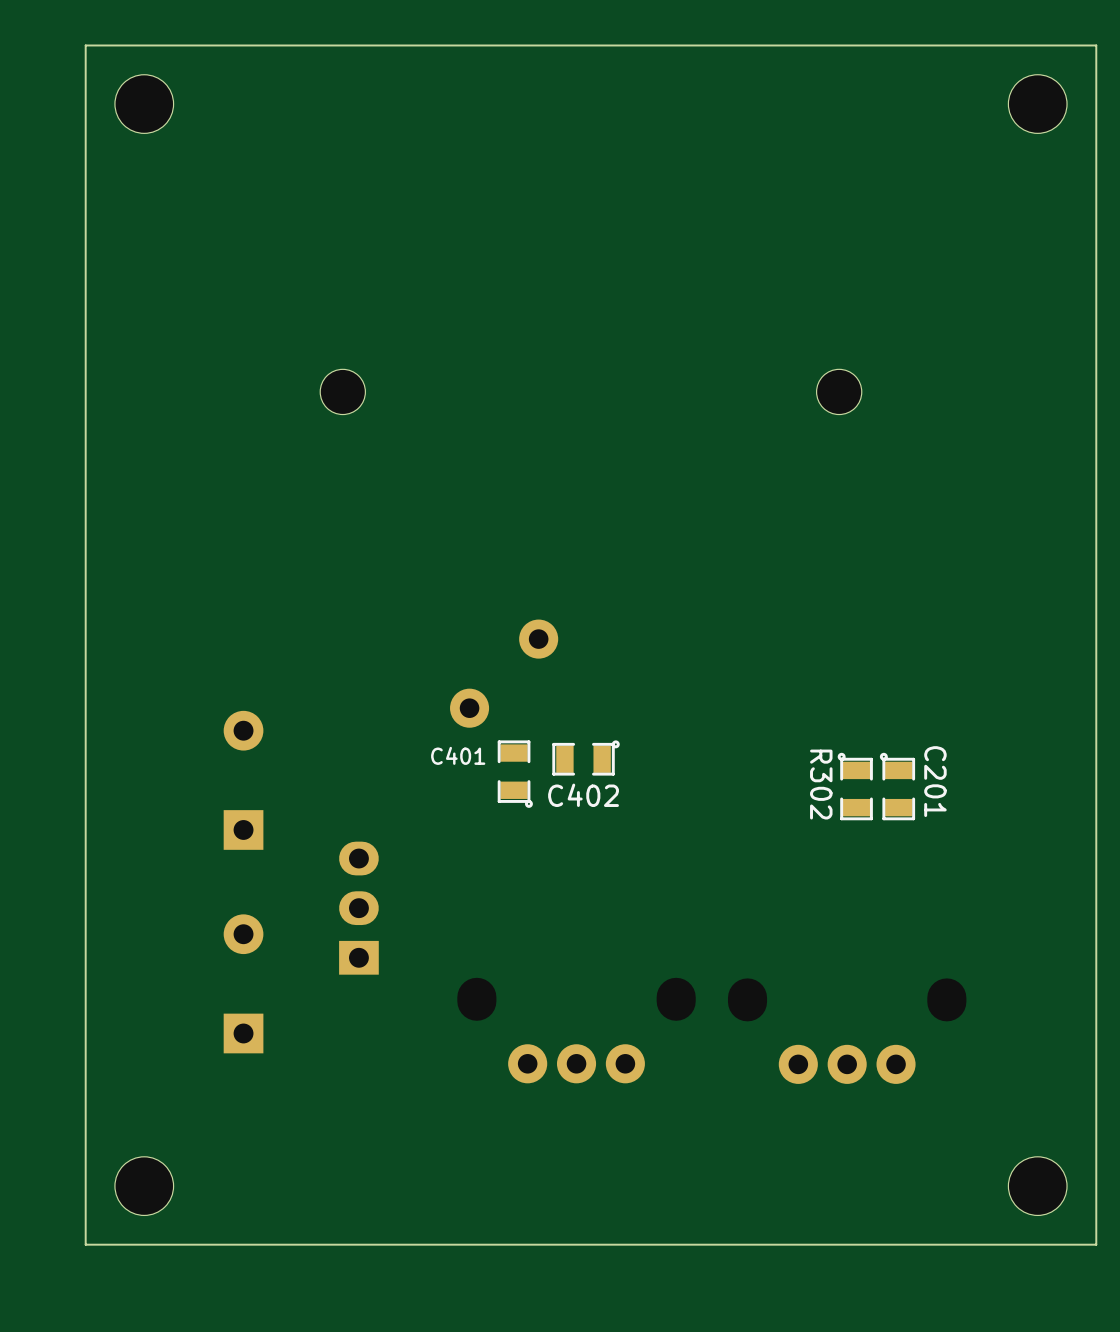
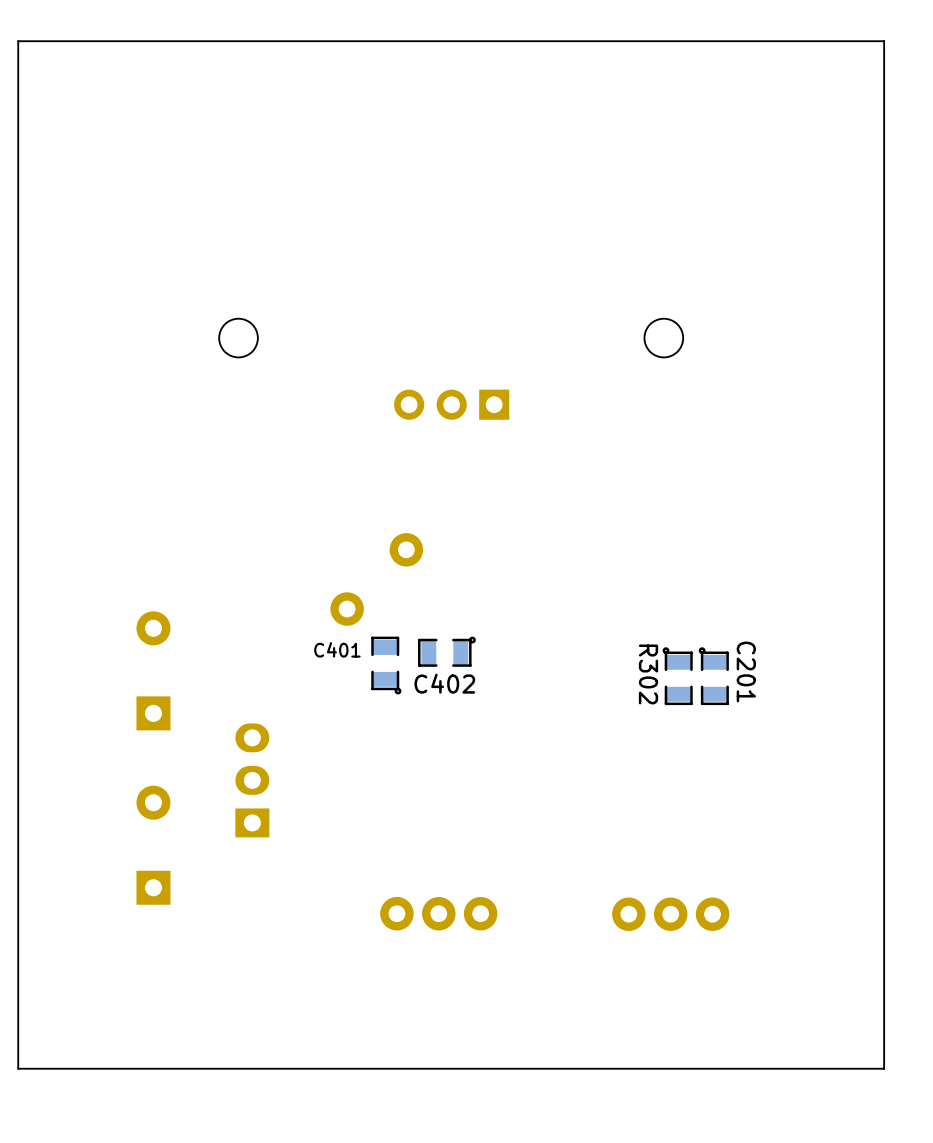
part: (144, 104) -> none
part: (1037, 104) -> none
part: none -> (451, 404)
part: (144, 1186) -> none
part: (1037, 1186) -> none

